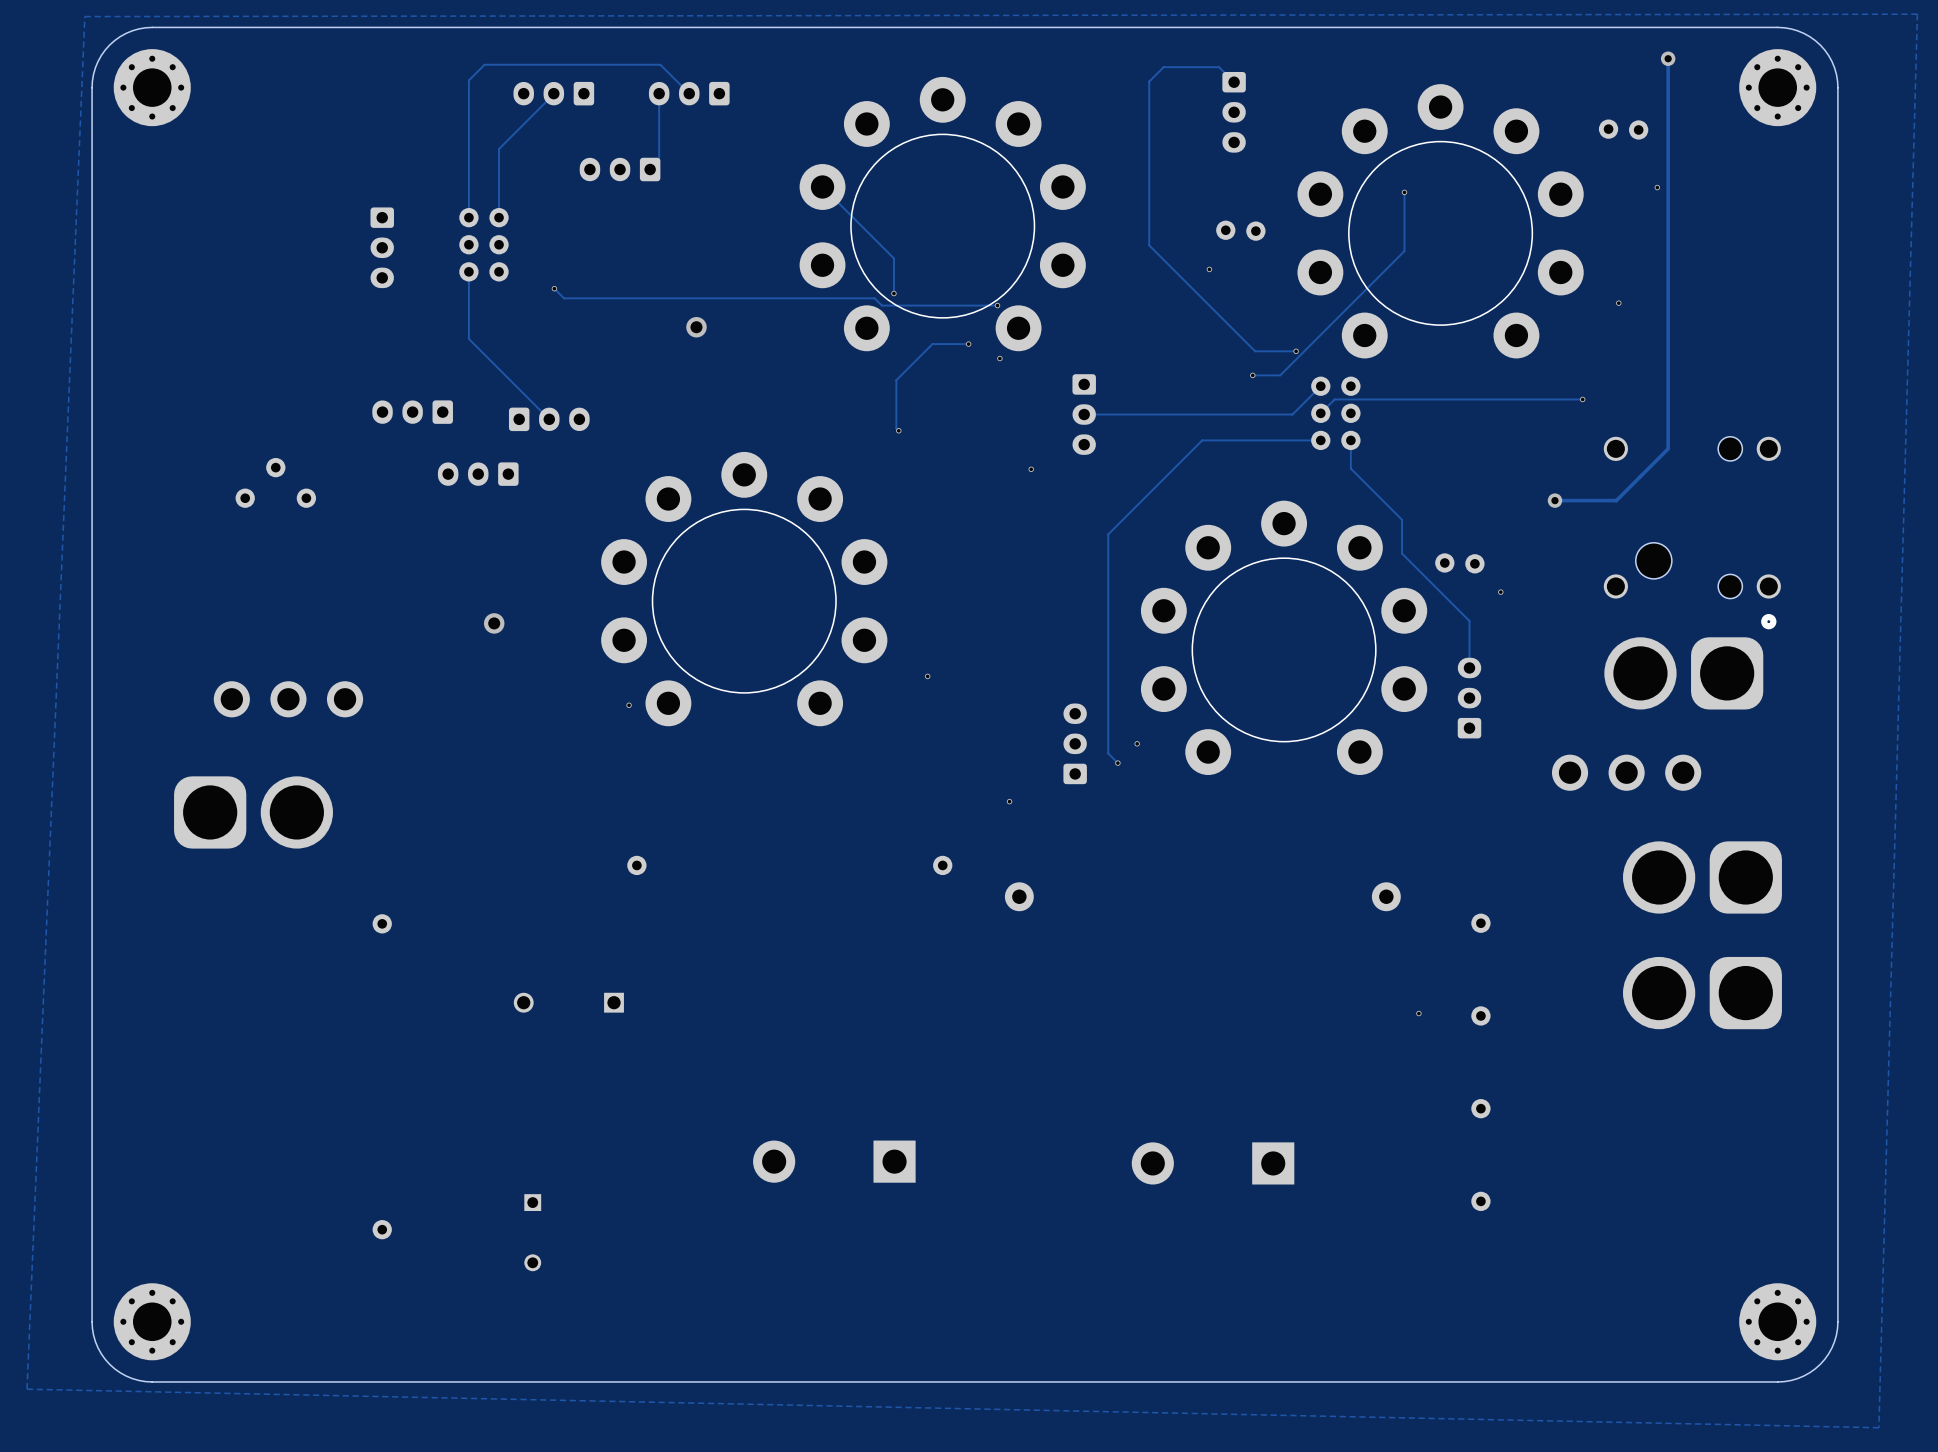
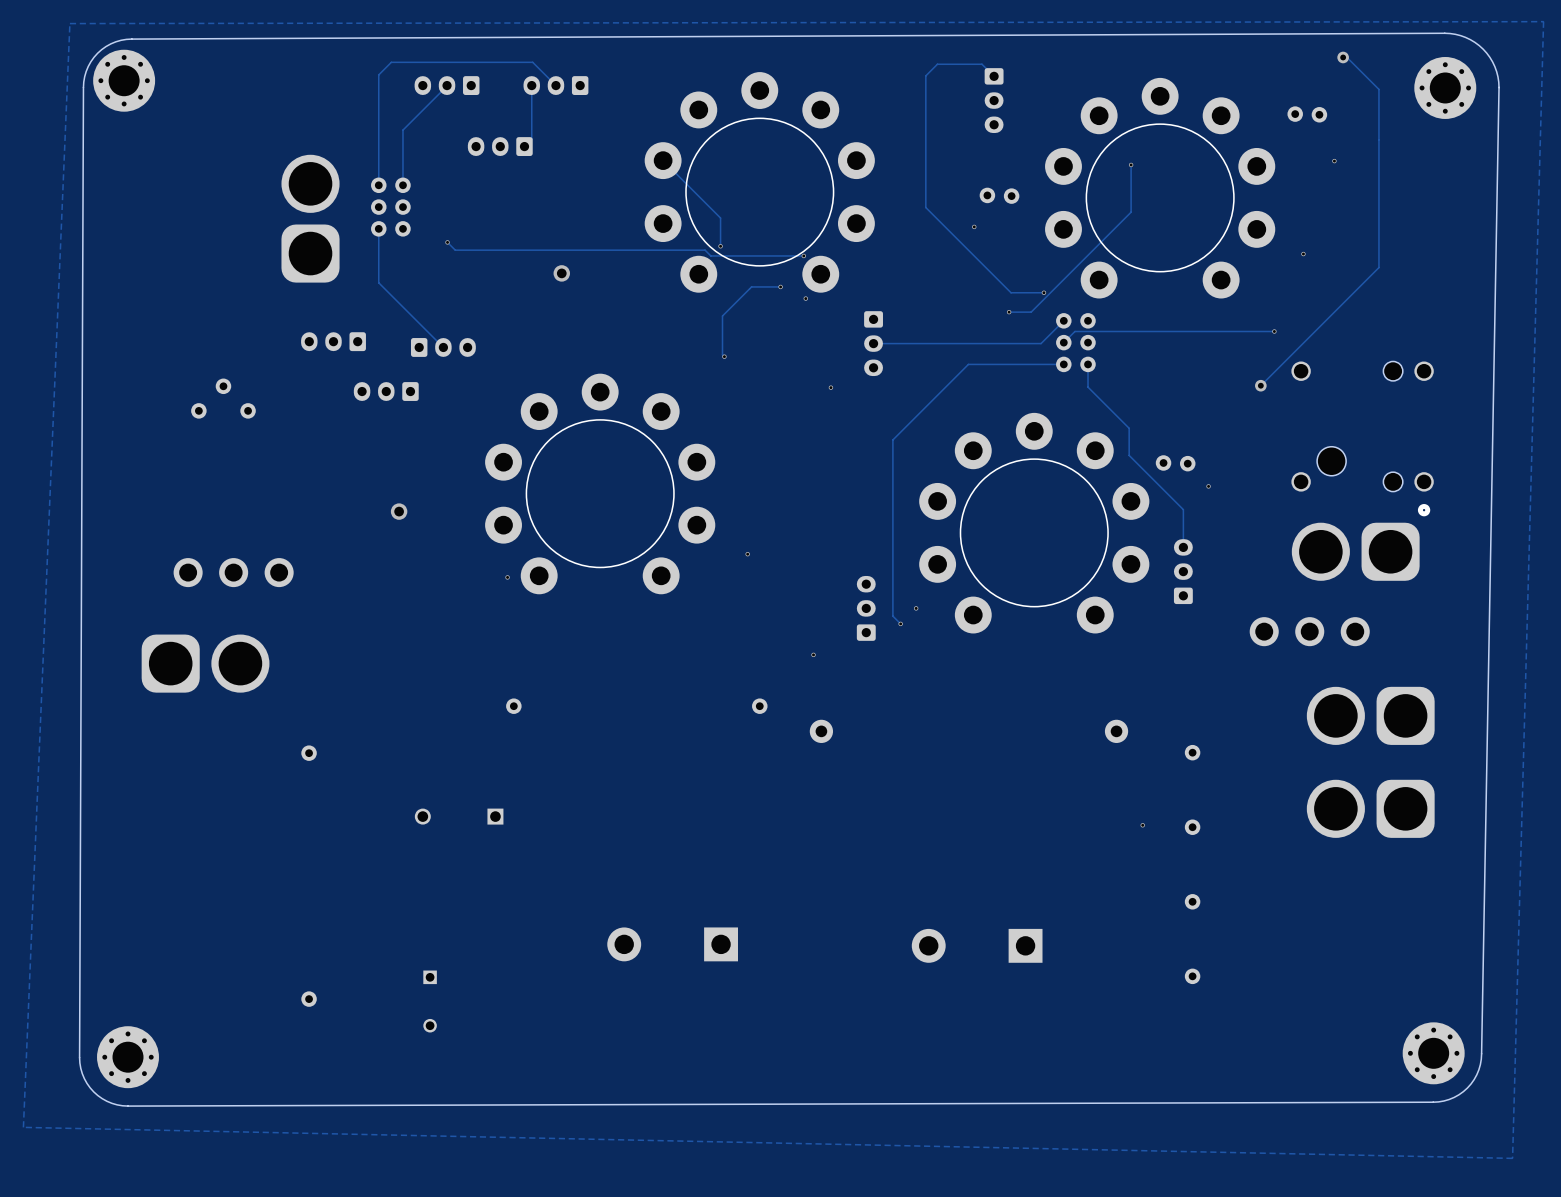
board edge: (1777, 27) (152, 27) (132, 30) (114, 40) (105, 50) (98, 61) (93, 74) (92, 87) (92, 1321) (95, 1341) (105, 1359) (114, 1368) (126, 1376) (138, 1380) (152, 1381) (1777, 1381) (1797, 1378) (1815, 1368) (1824, 1359) (1831, 1347) (1836, 1335) (1837, 1321) (1837, 87) (1834, 67) (1828, 55) (1820, 45) (1809, 36) (1797, 30) (1777, 27) -> (1444, 33) (1465, 37) (1483, 49) (1494, 66) (1499, 87) (1481, 1053) (1476, 1074) (1463, 1091) (1449, 1099) (1433, 1102) (128, 1106) (106, 1101) (90, 1087) (82, 1073) (79, 1057) (83, 87) (88, 66) (101, 49) (115, 41) (131, 39) (1444, 33)
track: none -> (1342, 52) (1378, 89) (1378, 267) (1260, 385)
track: (1668, 58) (1668, 448) (1616, 500) (1554, 500) -> none
part position: (1777, 87) -> (1445, 87)
part footprint: [370, 207, 394, 289] -> [281, 154, 340, 283]
via position: (1554, 500) -> (1260, 385)
part position: (152, 1321) -> (128, 1057)
part position: (1777, 1321) -> (1433, 1053)

